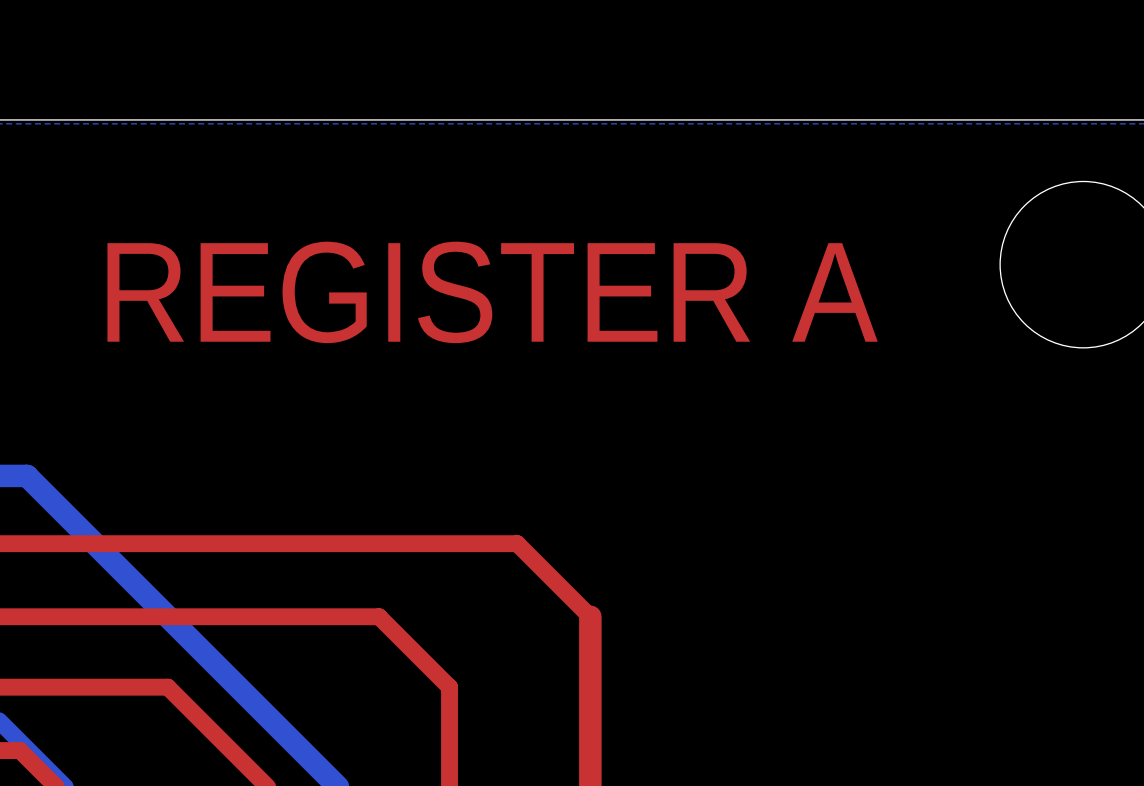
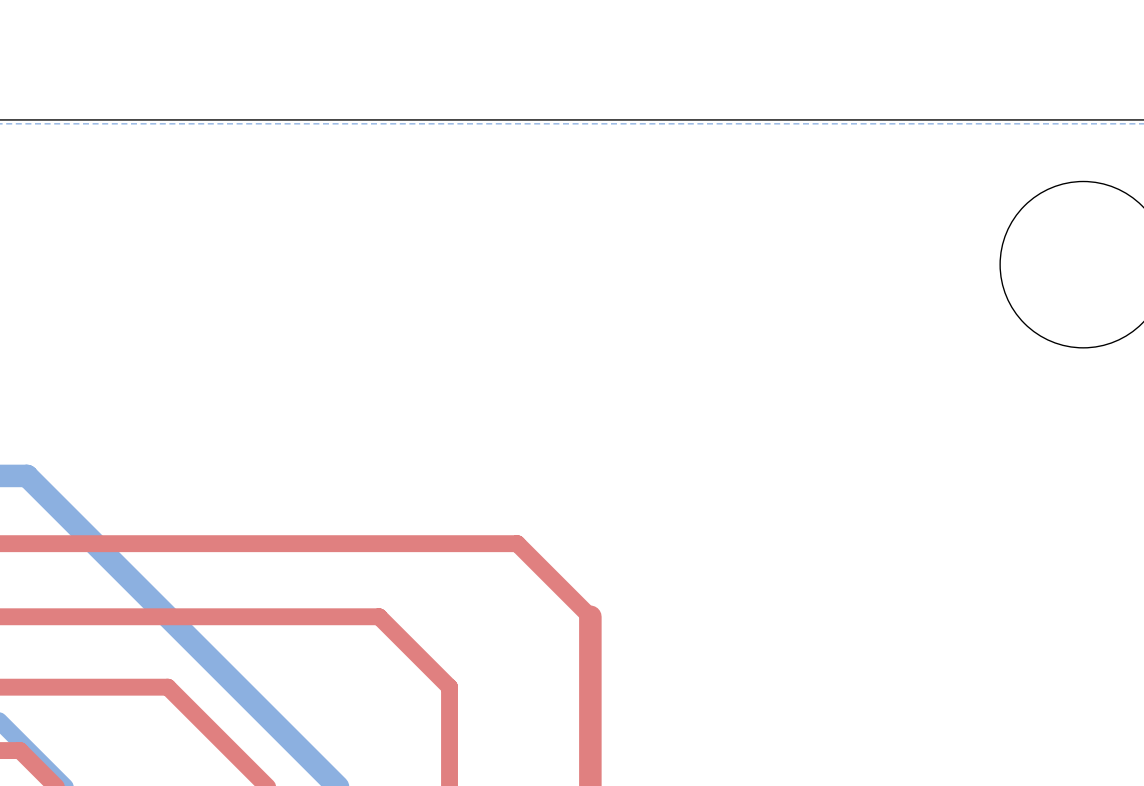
text: REGISTER A (492, 292) -> none

